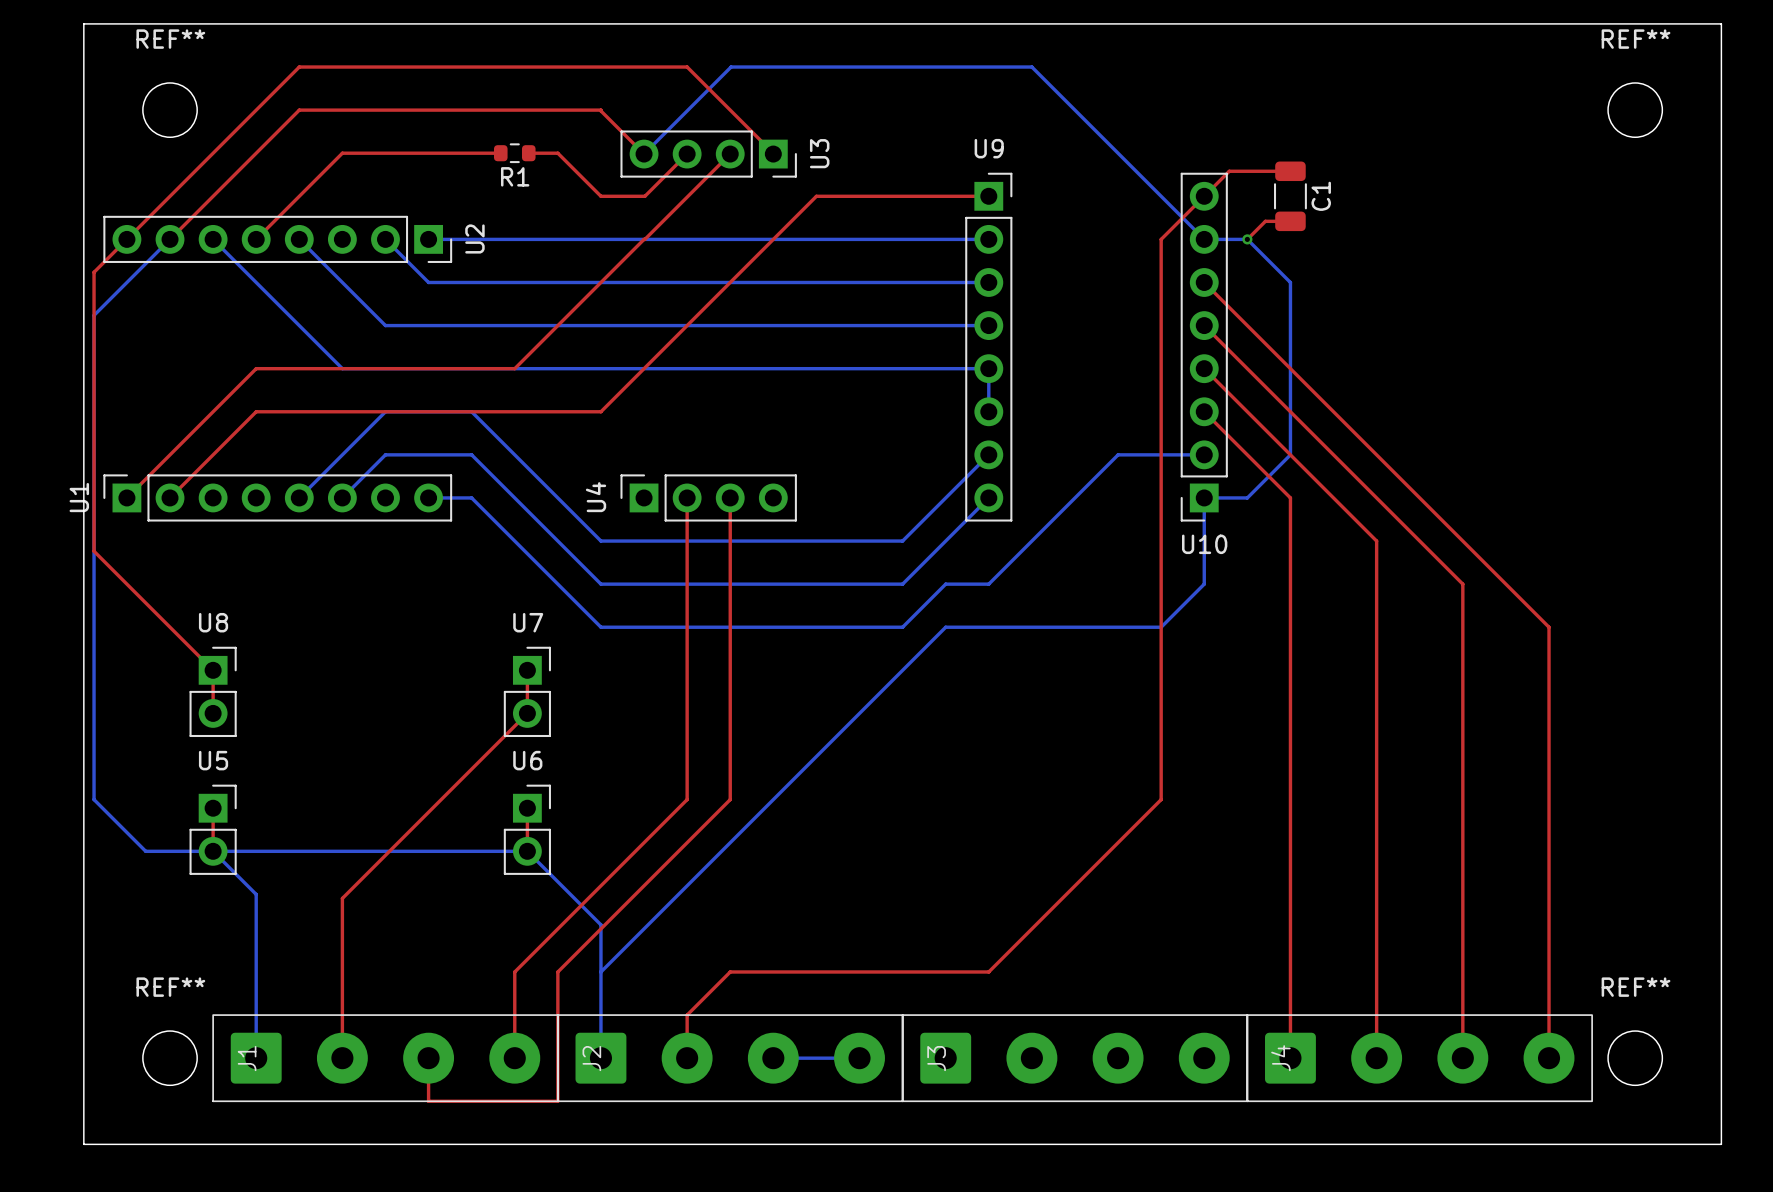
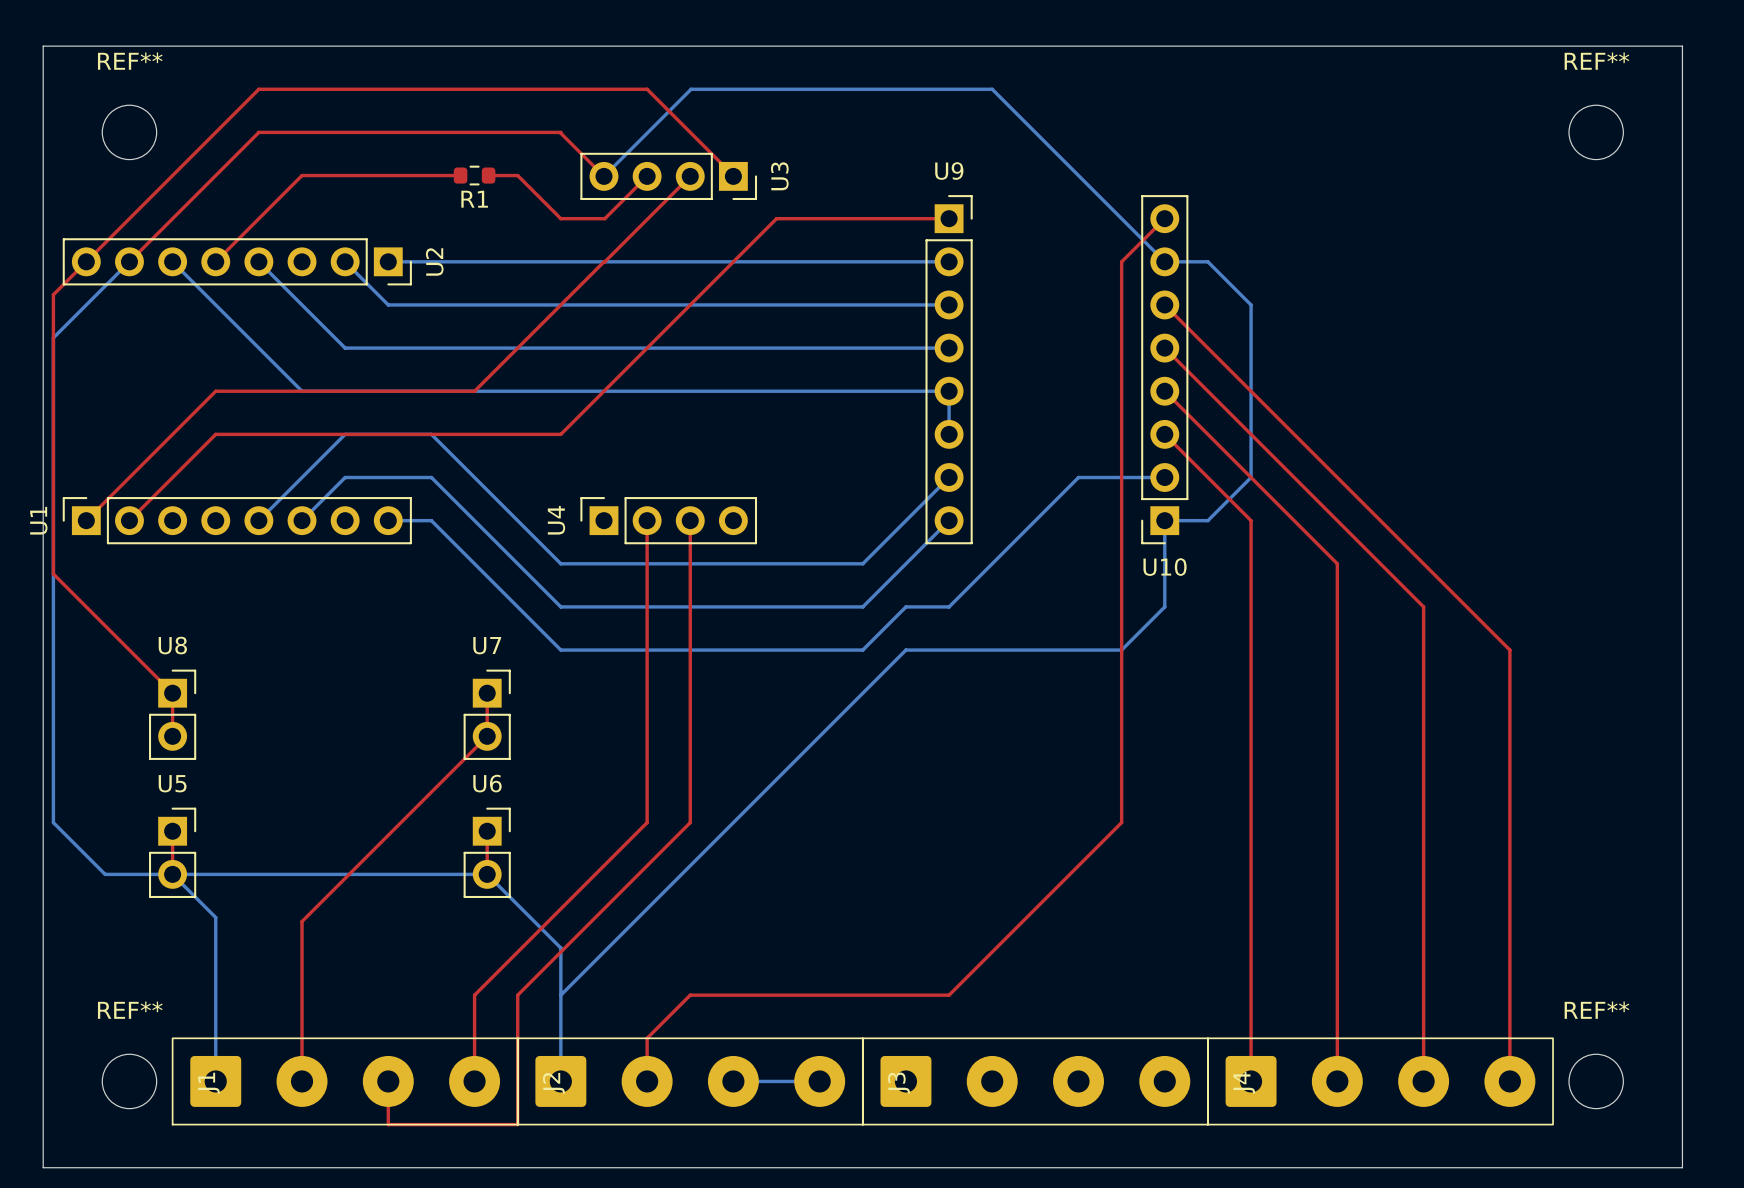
top track: (1290, 171) (1229, 171) (1204, 196) -> none
C1: (1290, 196) -> none
top track: (1290, 221) (1265, 221) (1247, 239) -> none
via: (1247, 239) -> none

